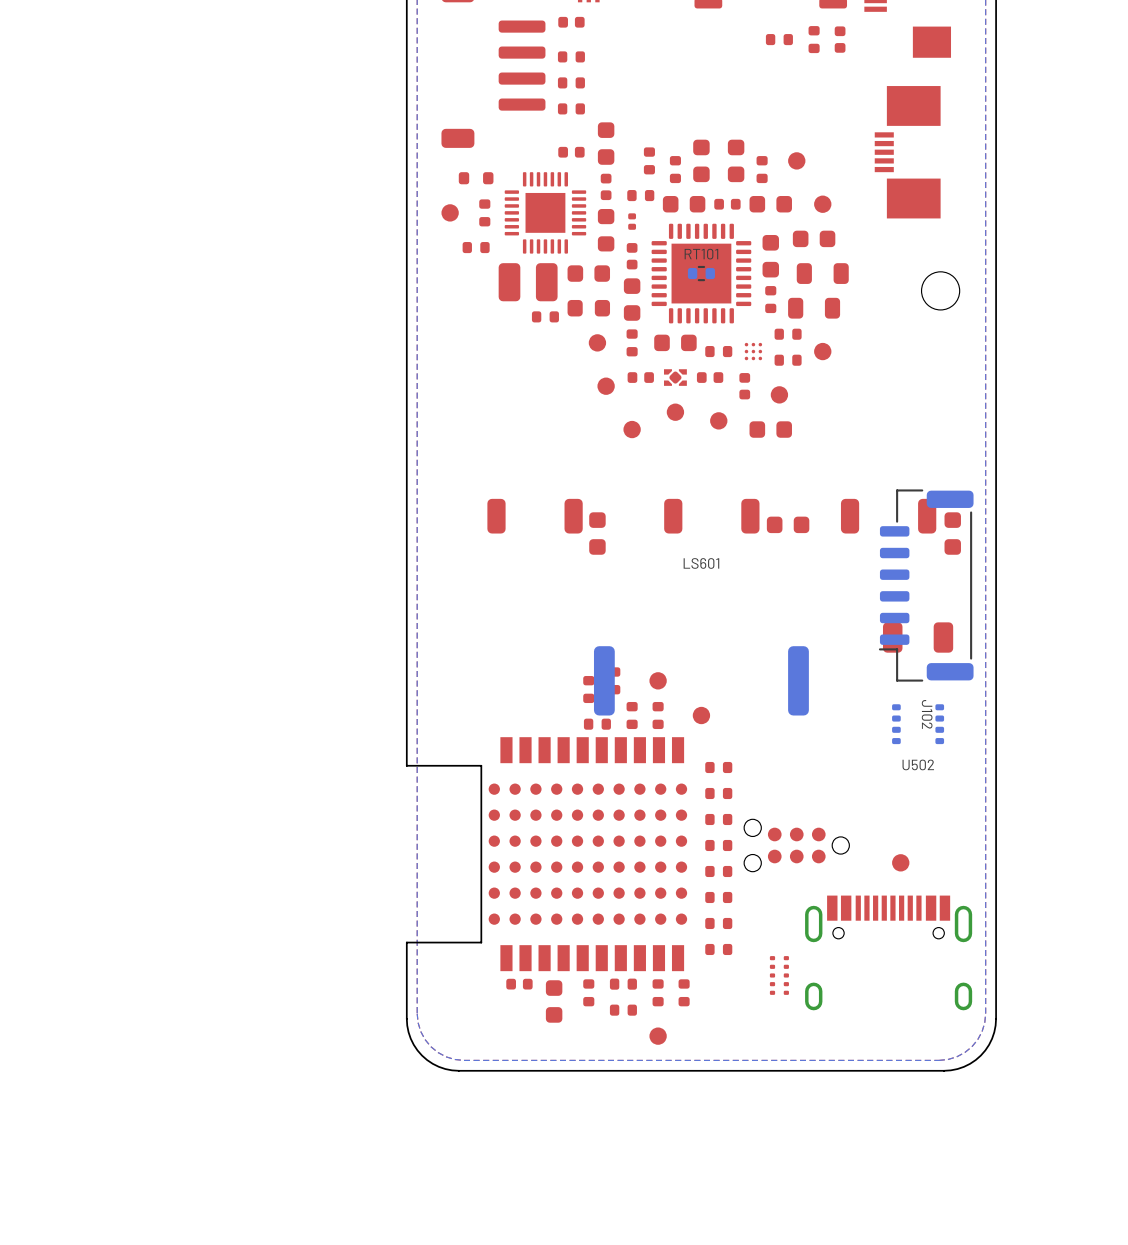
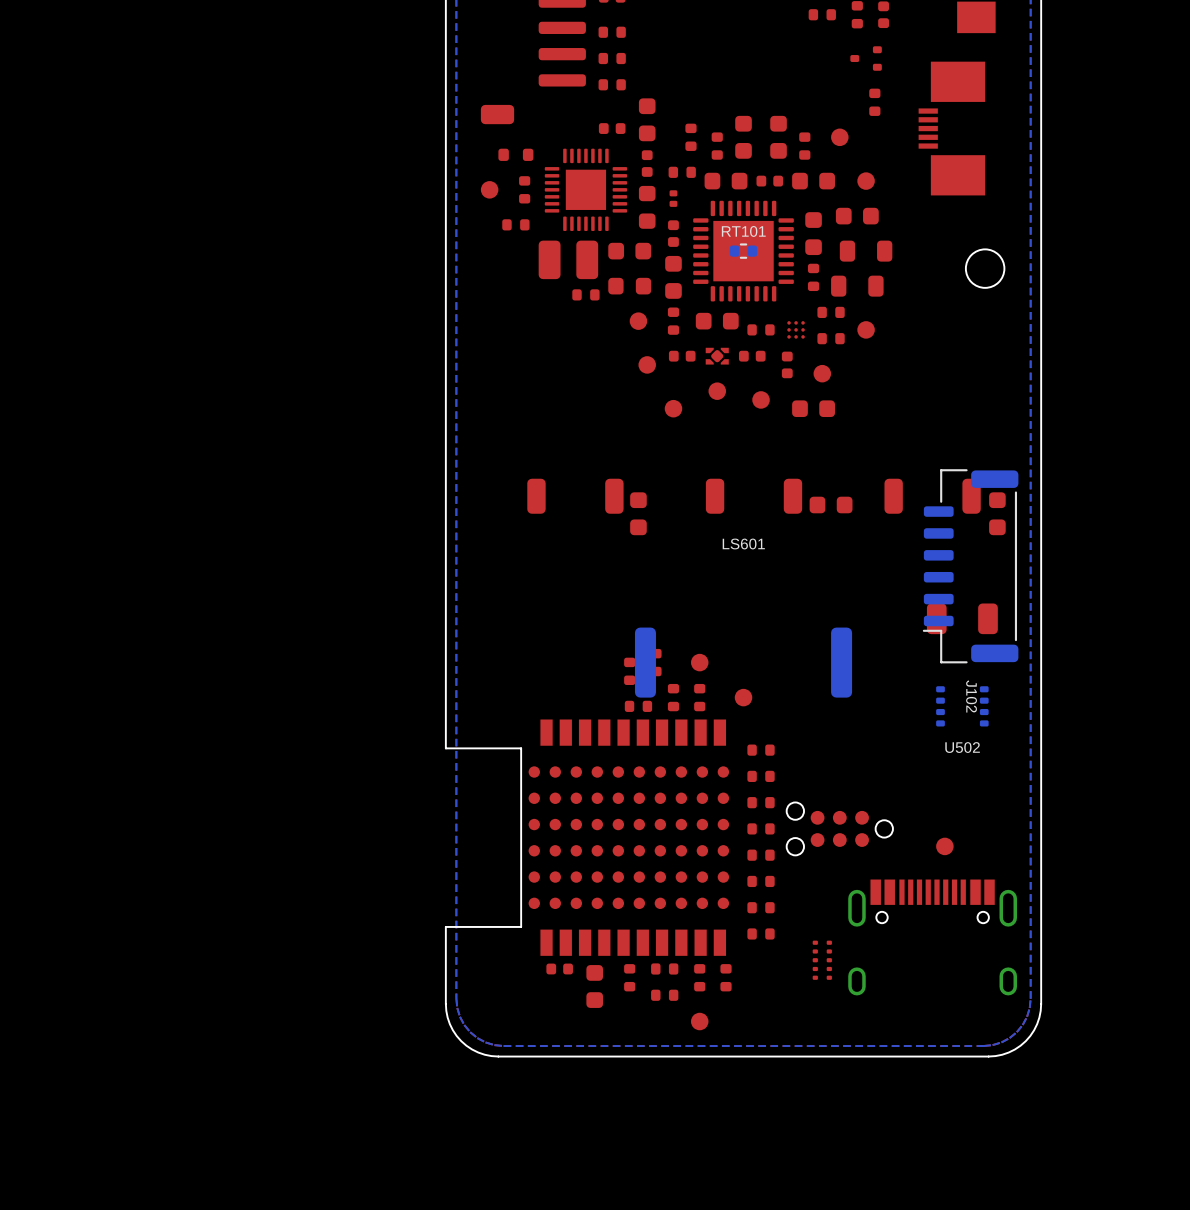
part: none -> (866, 58)
part: none -> (874, 102)

